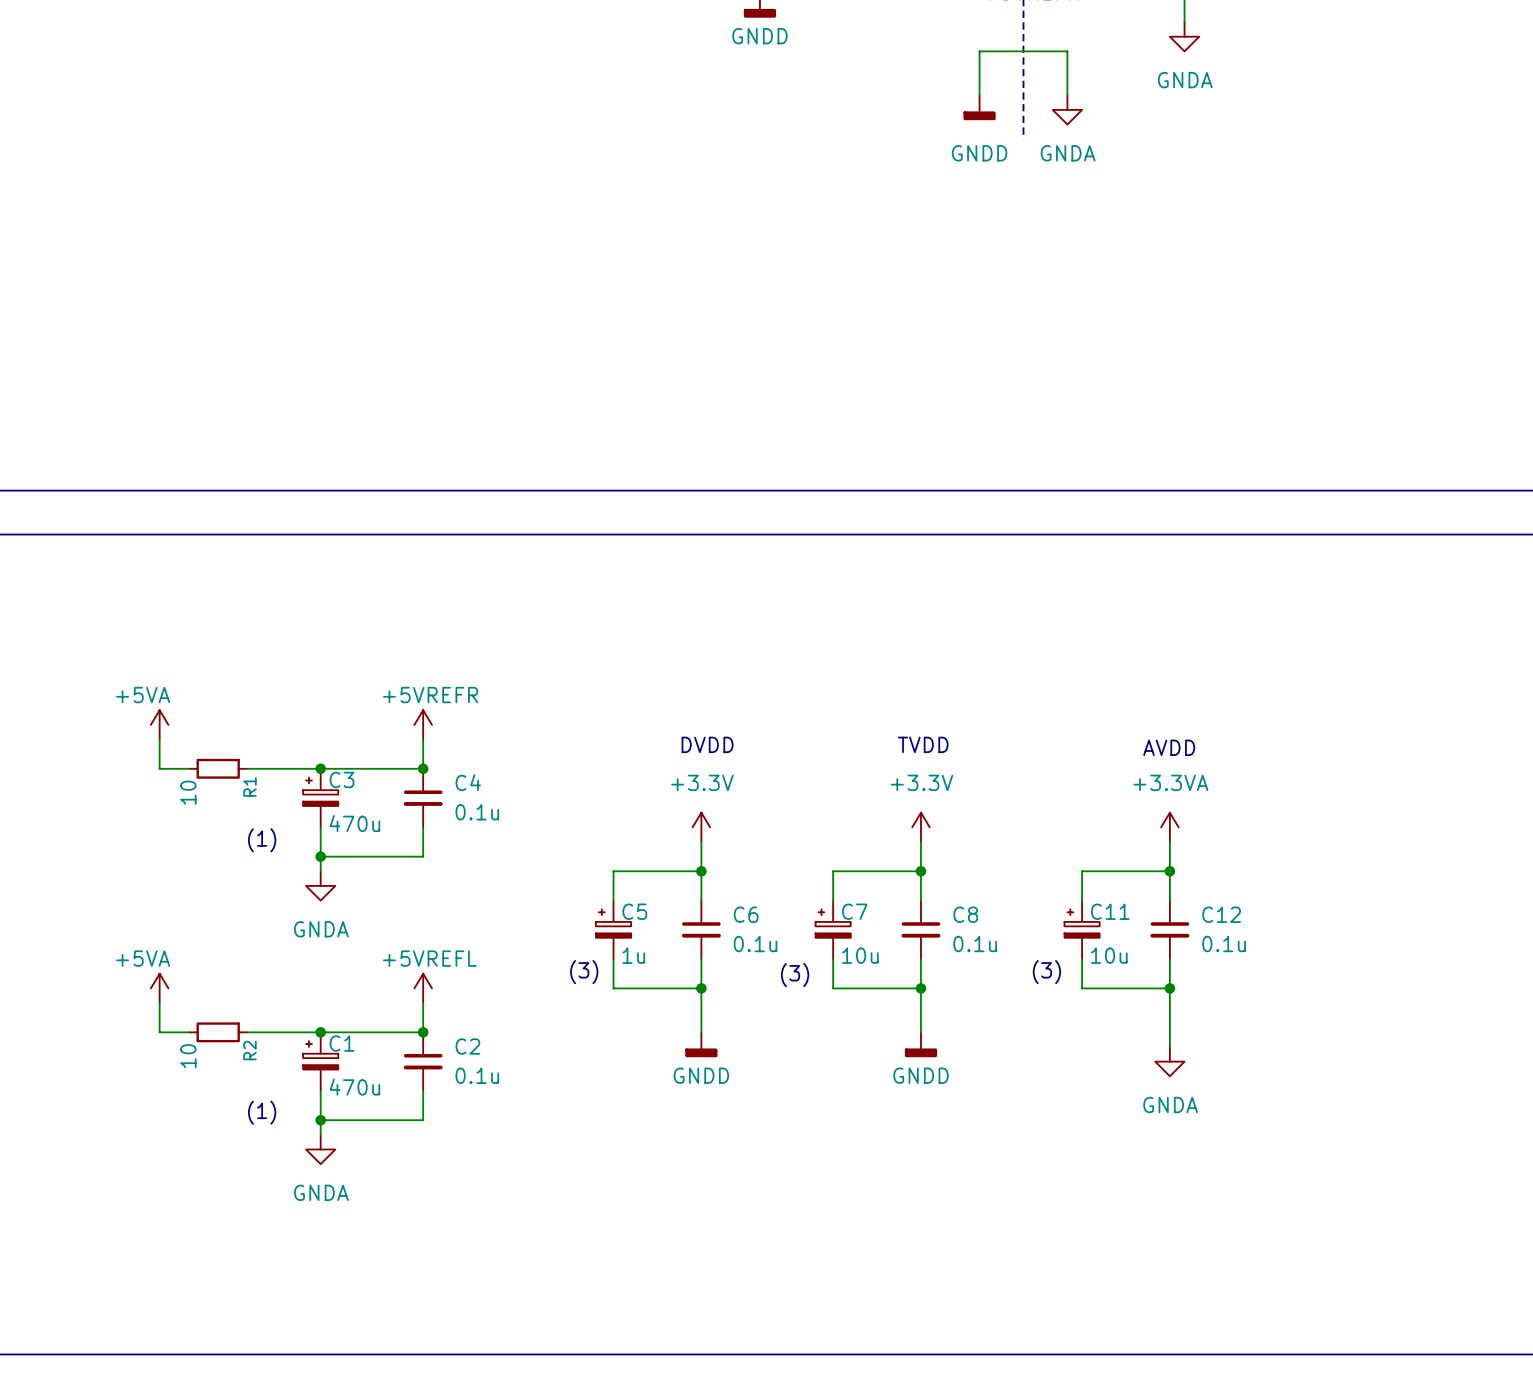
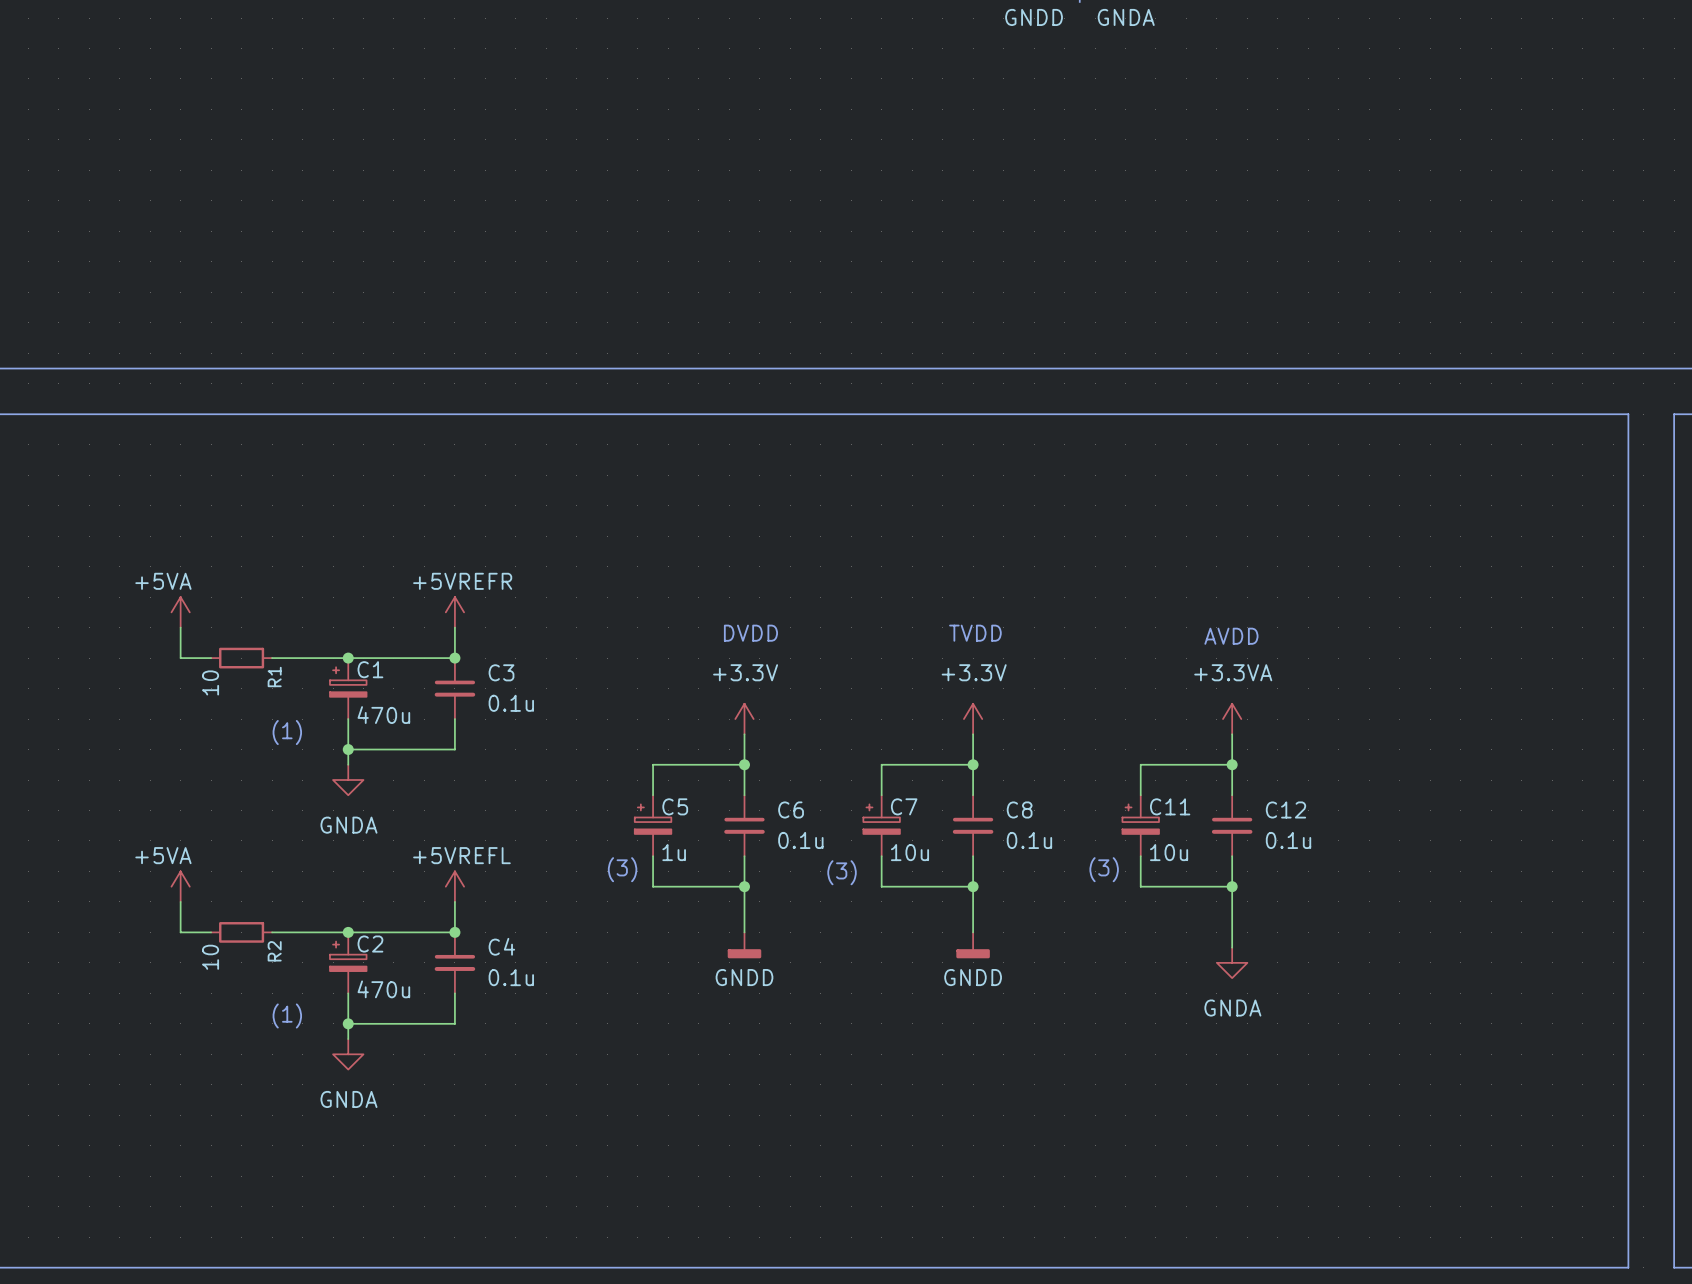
C3 name: C3 (342, 779) -> C1 (370, 669)
C4 name: C4 (468, 782) -> C3 (501, 672)
C1 name: C1 (342, 1043) -> C2 (370, 944)
C2 name: C2 (467, 1046) -> C4 (501, 946)

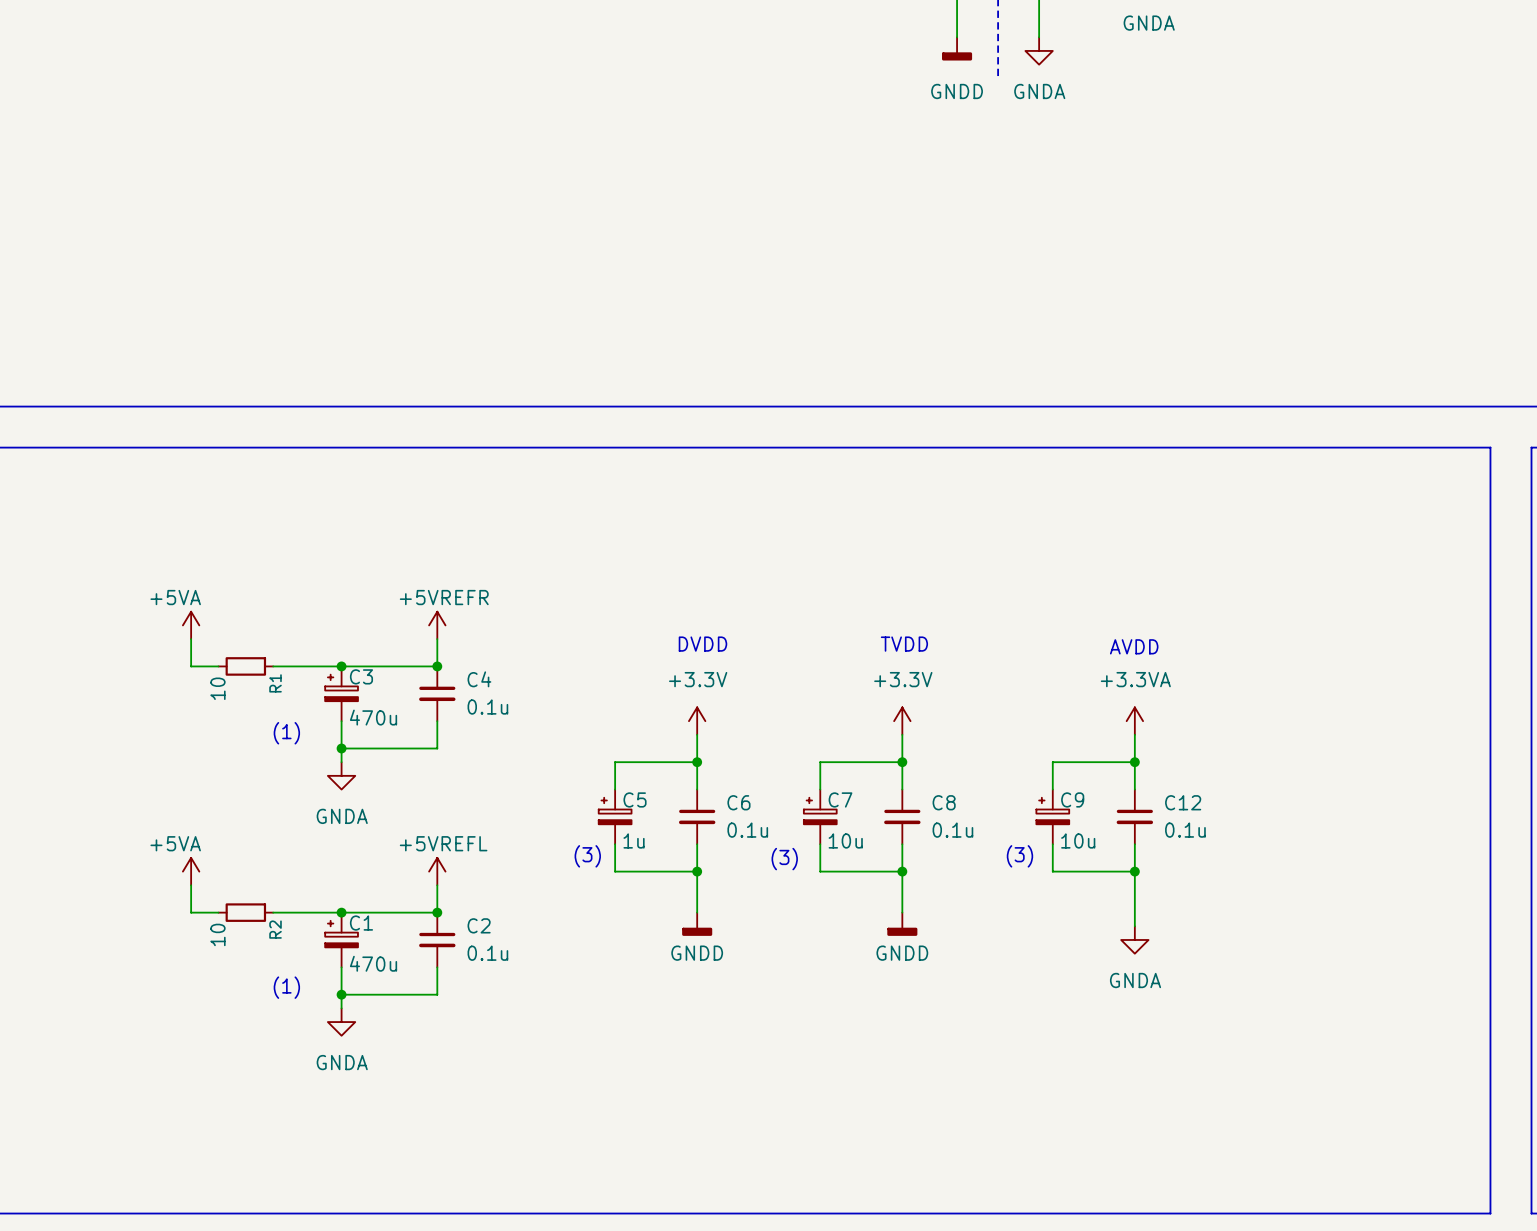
C1 name: C1 (370, 669) -> C3 (361, 676)
C3 name: C3 (501, 672) -> C4 (479, 679)
C11 name: C11 (1170, 806) -> C9 (1072, 799)
C2 name: C2 (370, 944) -> C1 (361, 923)
C4 name: C4 (501, 946) -> C2 (479, 925)

